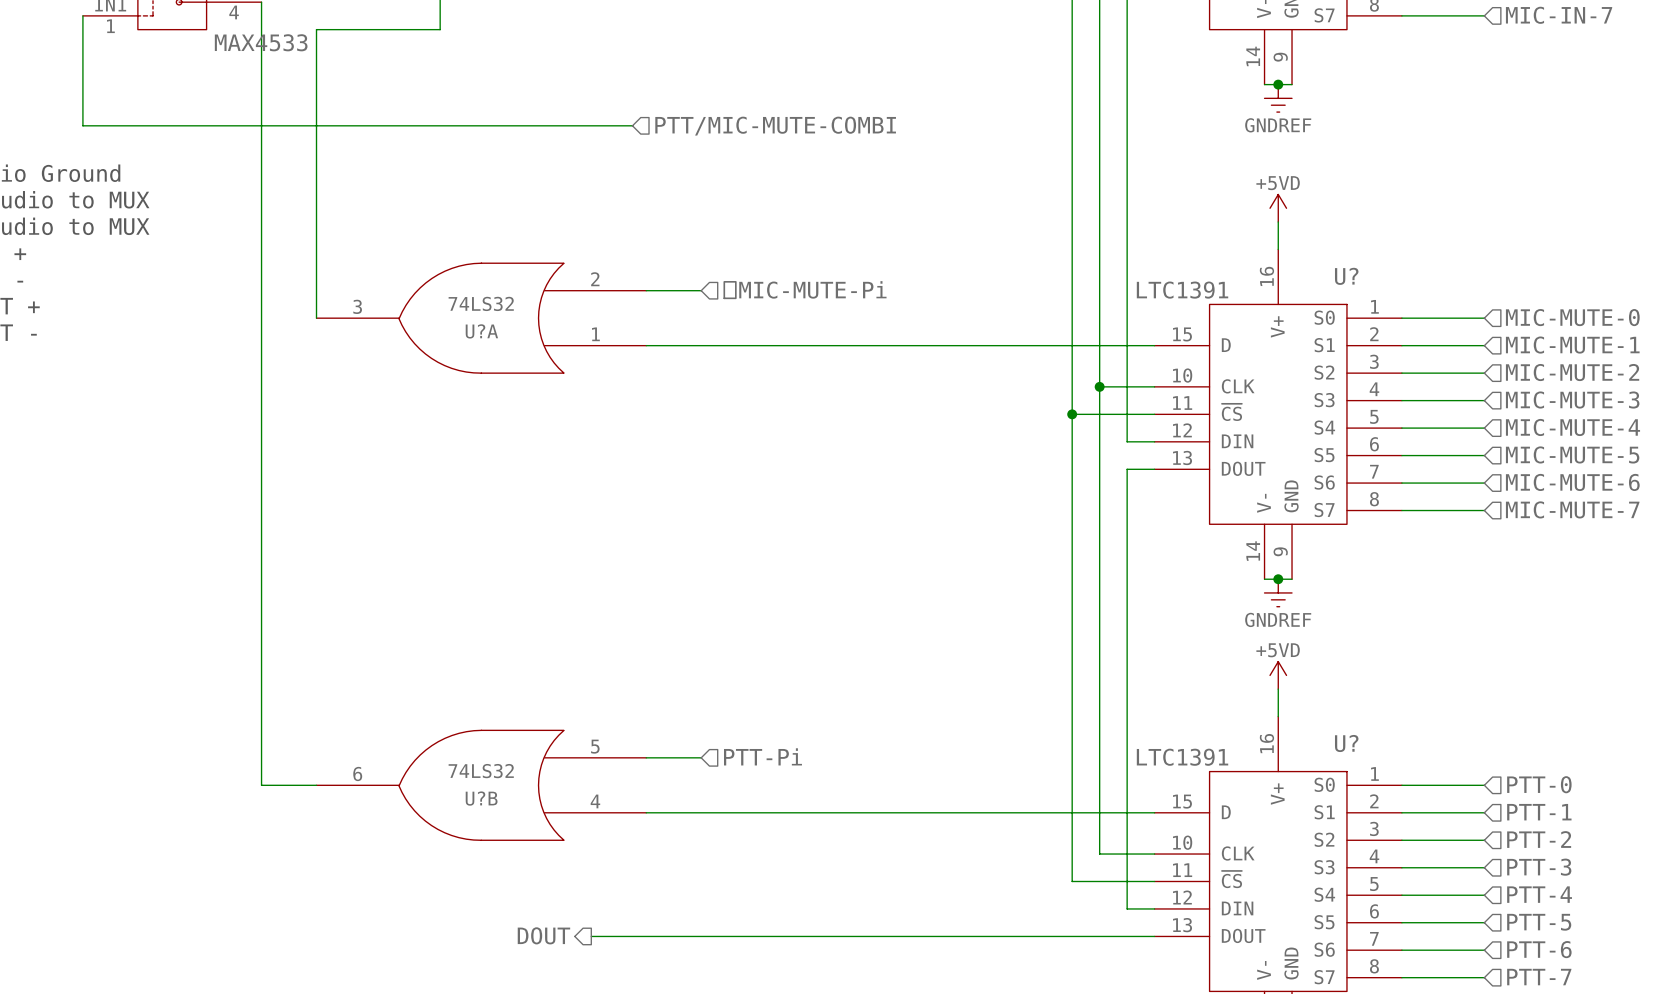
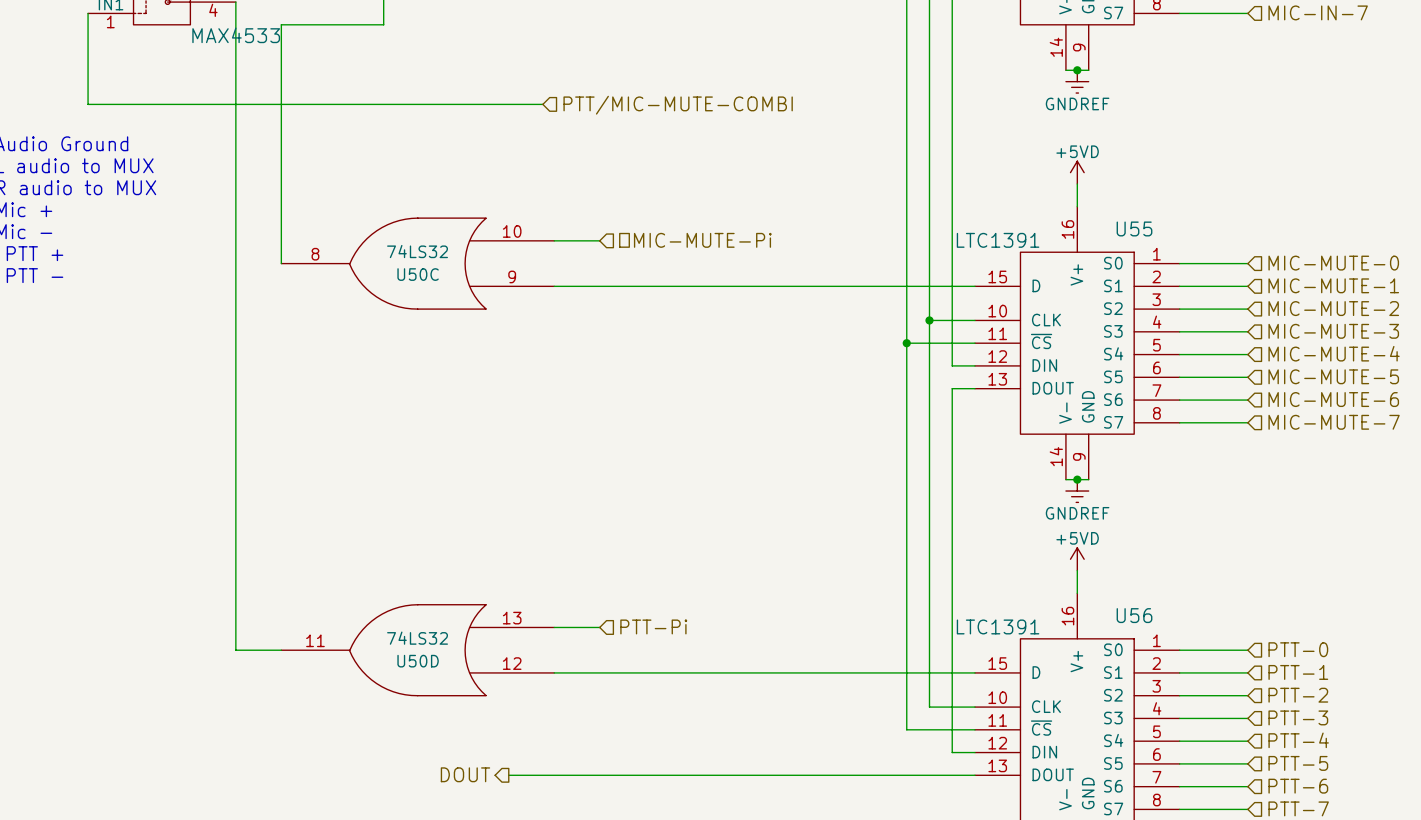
U? name: U? (1346, 276) -> U55 (1134, 228)
U?A pin number: 2 (595, 279) -> 10 (512, 231)
U?A pin number: 3 (357, 306) -> 8 (315, 254)
U?A name: U?A (481, 331) -> U50C (418, 274)
U?A pin number: 1 (595, 334) -> 9 (512, 276)
U? name: U? (1346, 743) -> U56 (1134, 615)
U?B pin number: 5 (595, 746) -> 13 (512, 618)
U?B pin number: 6 (357, 773) -> 11 (315, 640)
U?B name: U?B (481, 798) -> U50D (418, 661)
U?B pin number: 4 (595, 801) -> 12 (512, 663)

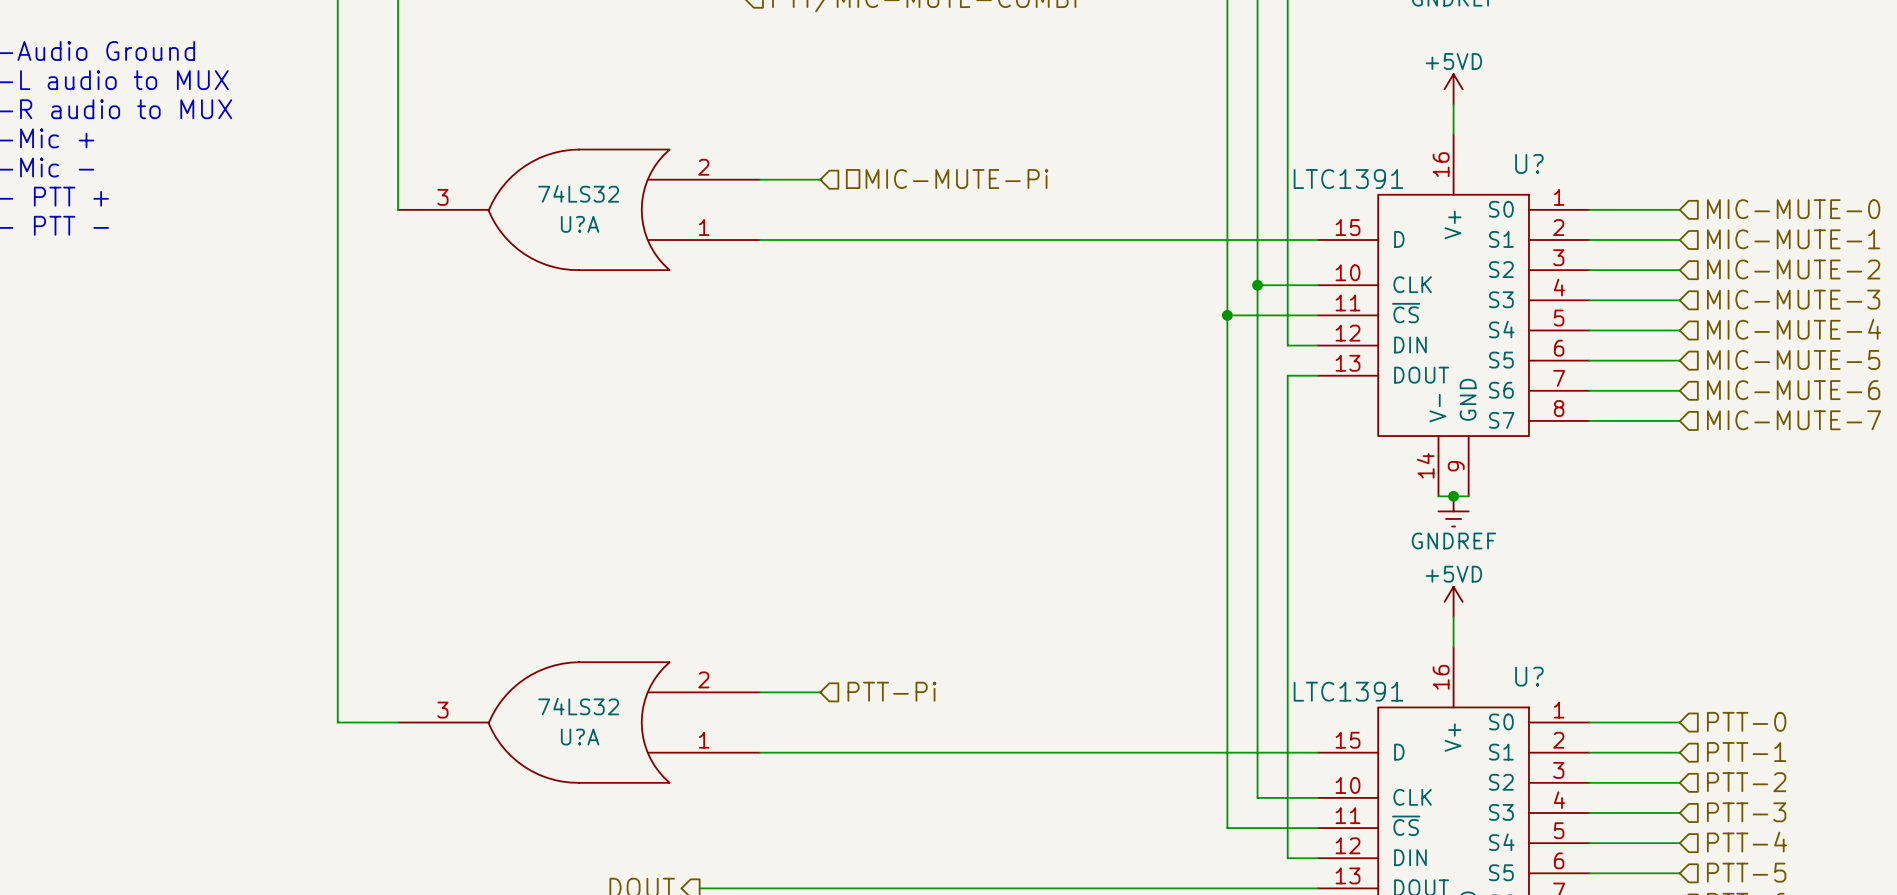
U55 name: U55 (1134, 228) -> U? (1529, 163)
U50C pin number: 10 (512, 231) -> 2 (703, 167)
U50C pin number: 8 (315, 254) -> 3 (442, 197)
U50C name: U50C (418, 274) -> U?A (580, 224)
U50C pin number: 9 (512, 276) -> 1 (704, 227)
U56 name: U56 (1134, 615) -> U? (1529, 676)
U50D pin number: 13 (512, 618) -> 2 (703, 679)
U50D pin number: 11 (315, 640) -> 3 (442, 710)
U50D name: U50D (418, 661) -> U?A (580, 737)
U50D pin number: 12 (512, 663) -> 1 (704, 740)

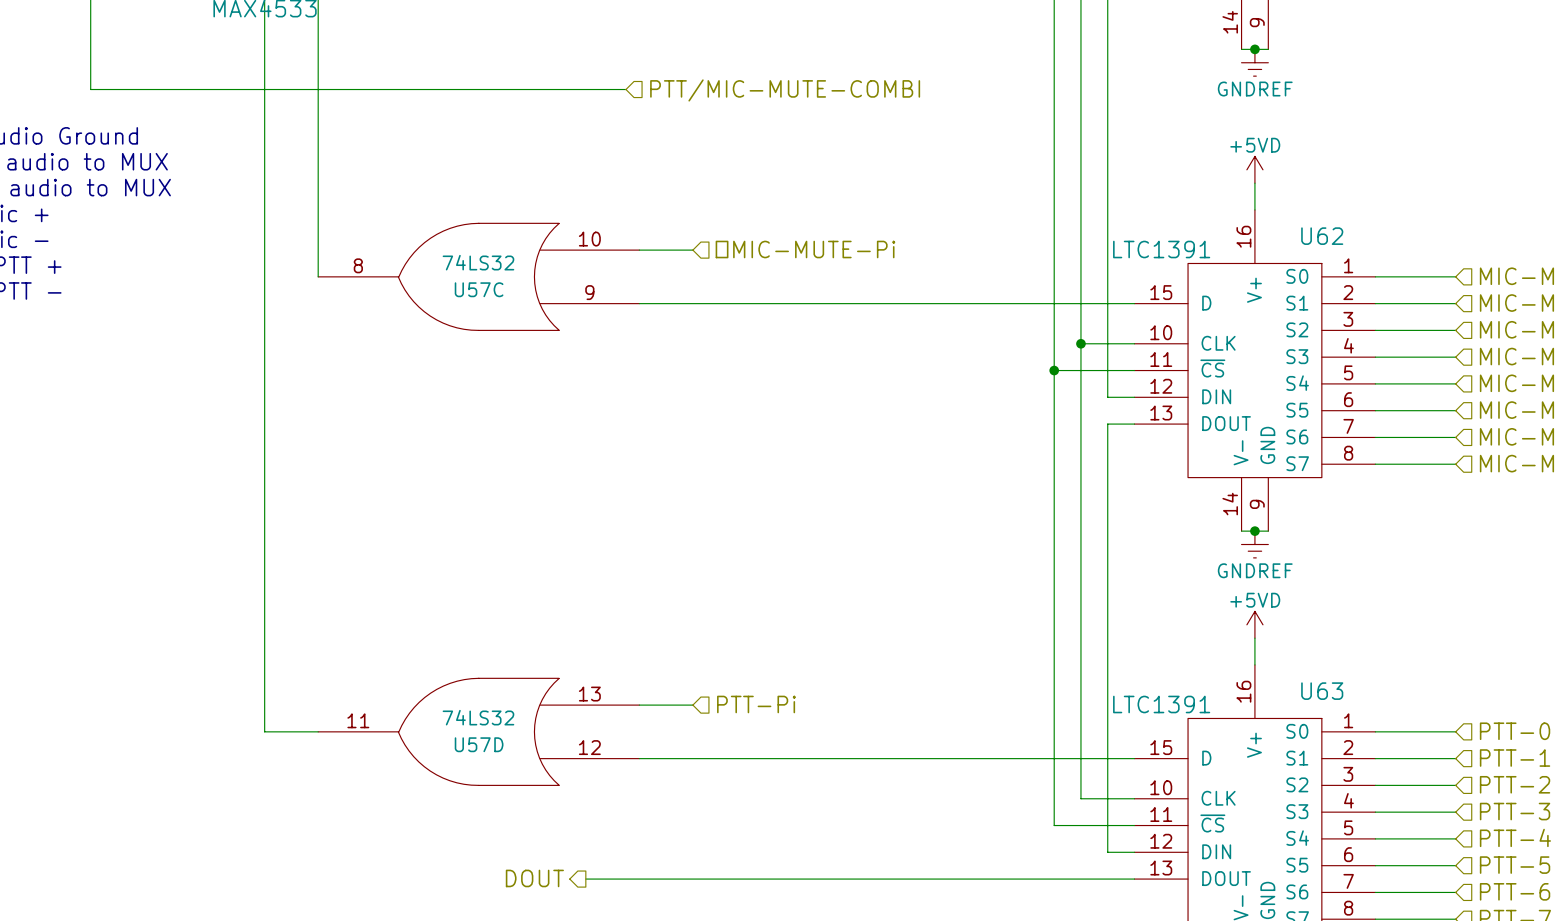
U? name: U? (1529, 163) -> U62 (1322, 236)
U?A pin number: 2 (703, 167) -> 10 (589, 239)
U?A pin number: 3 (442, 197) -> 8 (358, 265)
U?A name: U?A (580, 224) -> U57C (479, 289)
U?A pin number: 1 (704, 227) -> 9 (589, 292)
U? name: U? (1529, 676) -> U63 (1322, 691)
U?A pin number: 2 (703, 679) -> 13 (589, 694)
U?A pin number: 3 (442, 710) -> 11 (358, 720)
U?A name: U?A (580, 737) -> U57D (479, 744)
U?A pin number: 1 (704, 740) -> 12 (589, 747)

